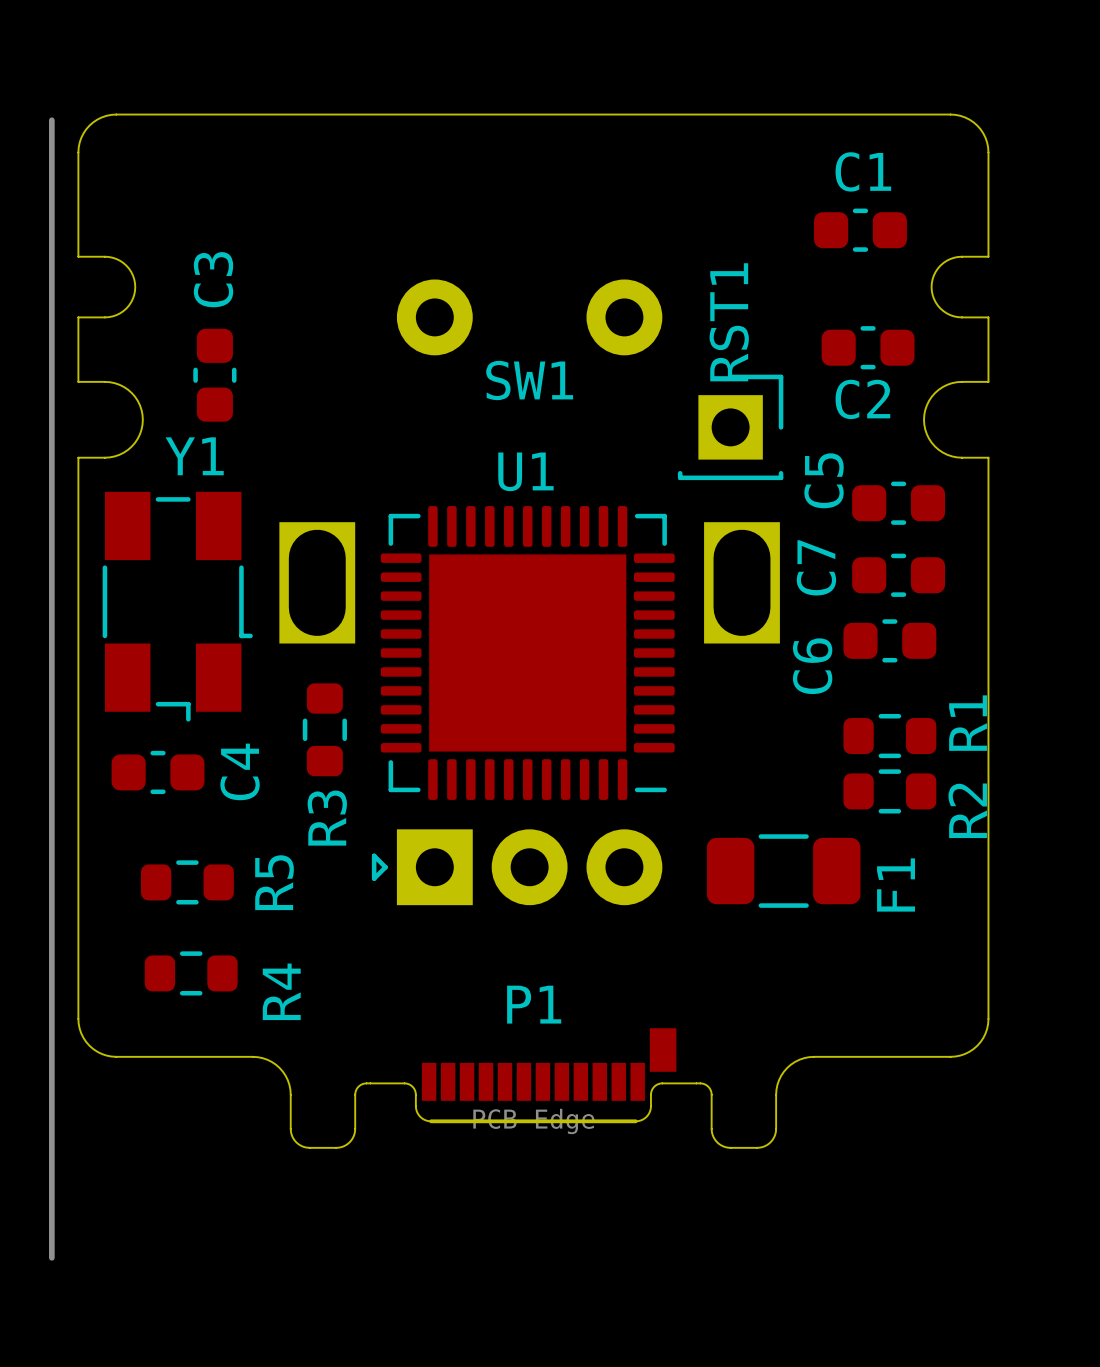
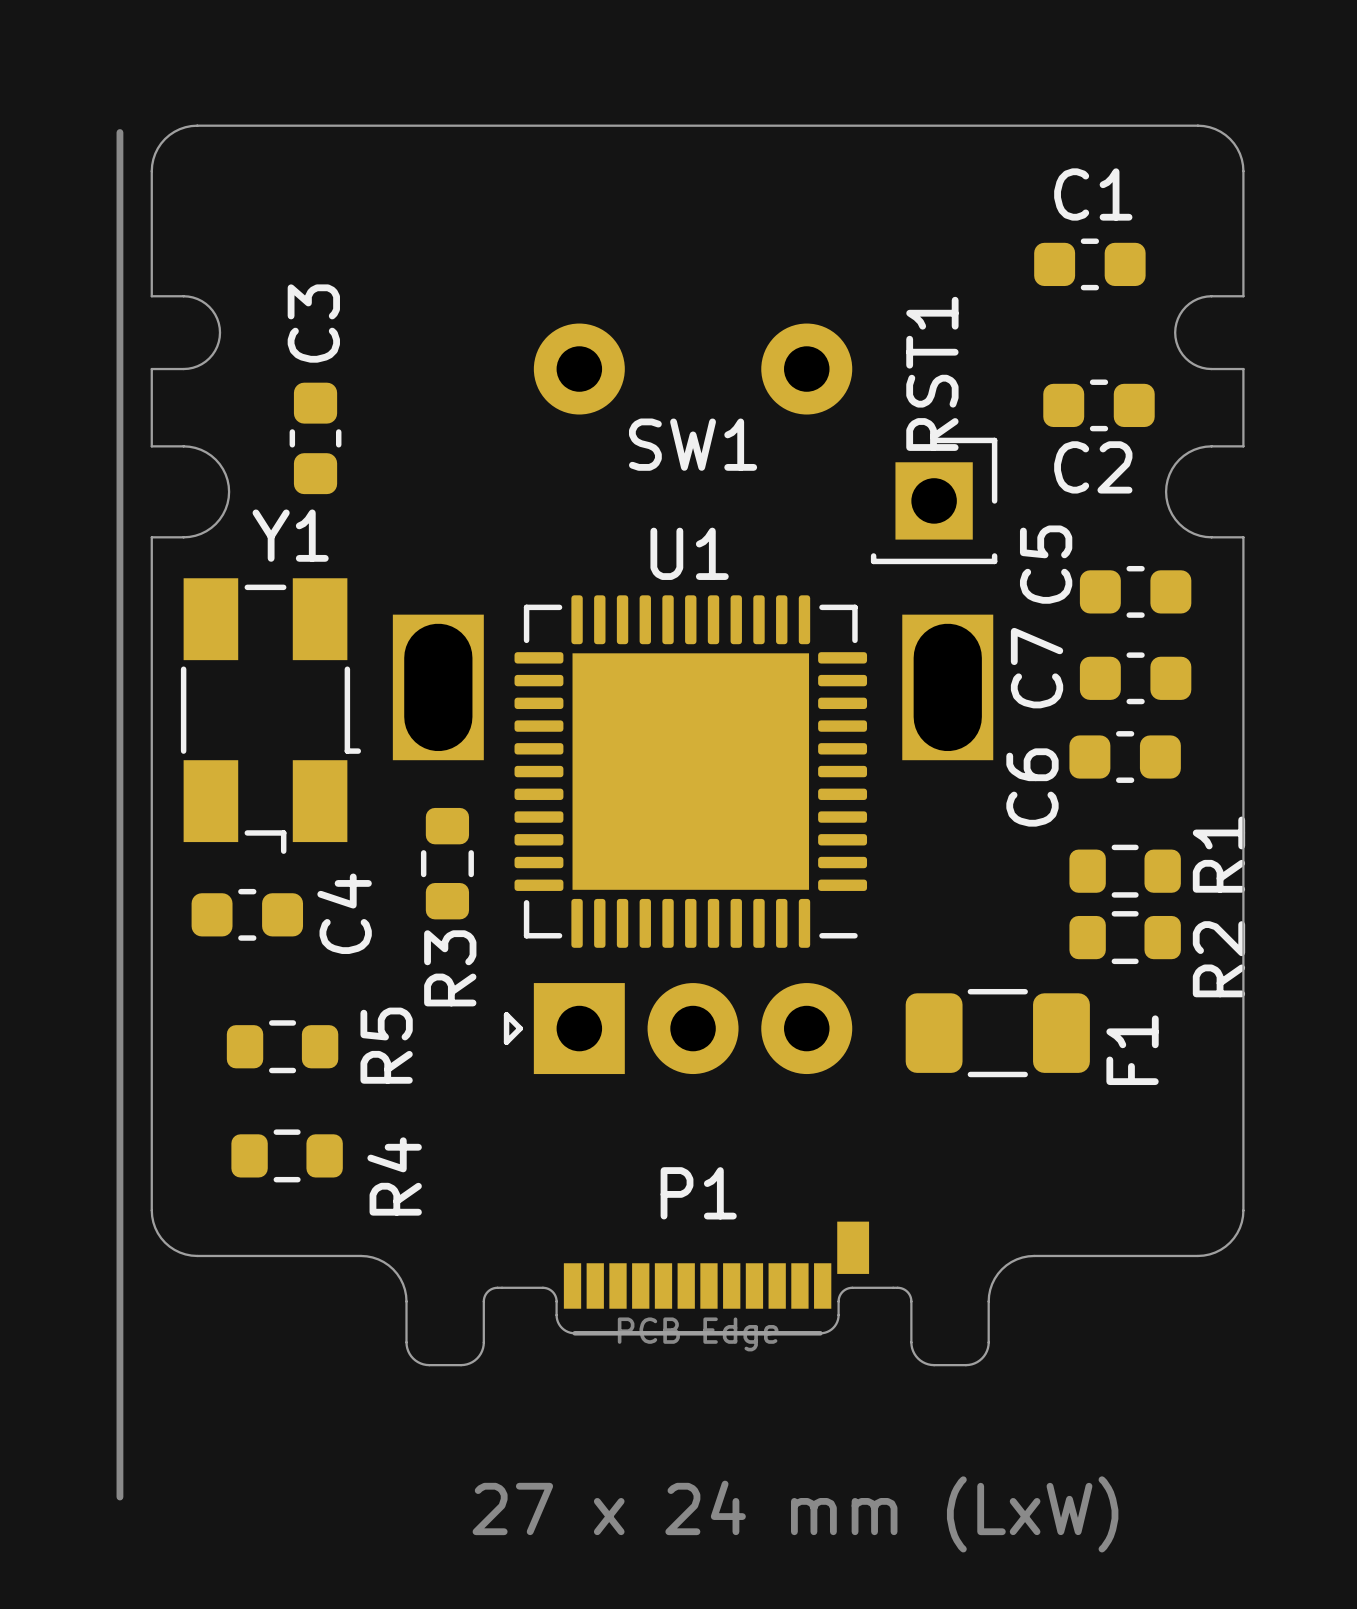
text: none -> 27 x 24 mm (LxW) (795, 1514)

